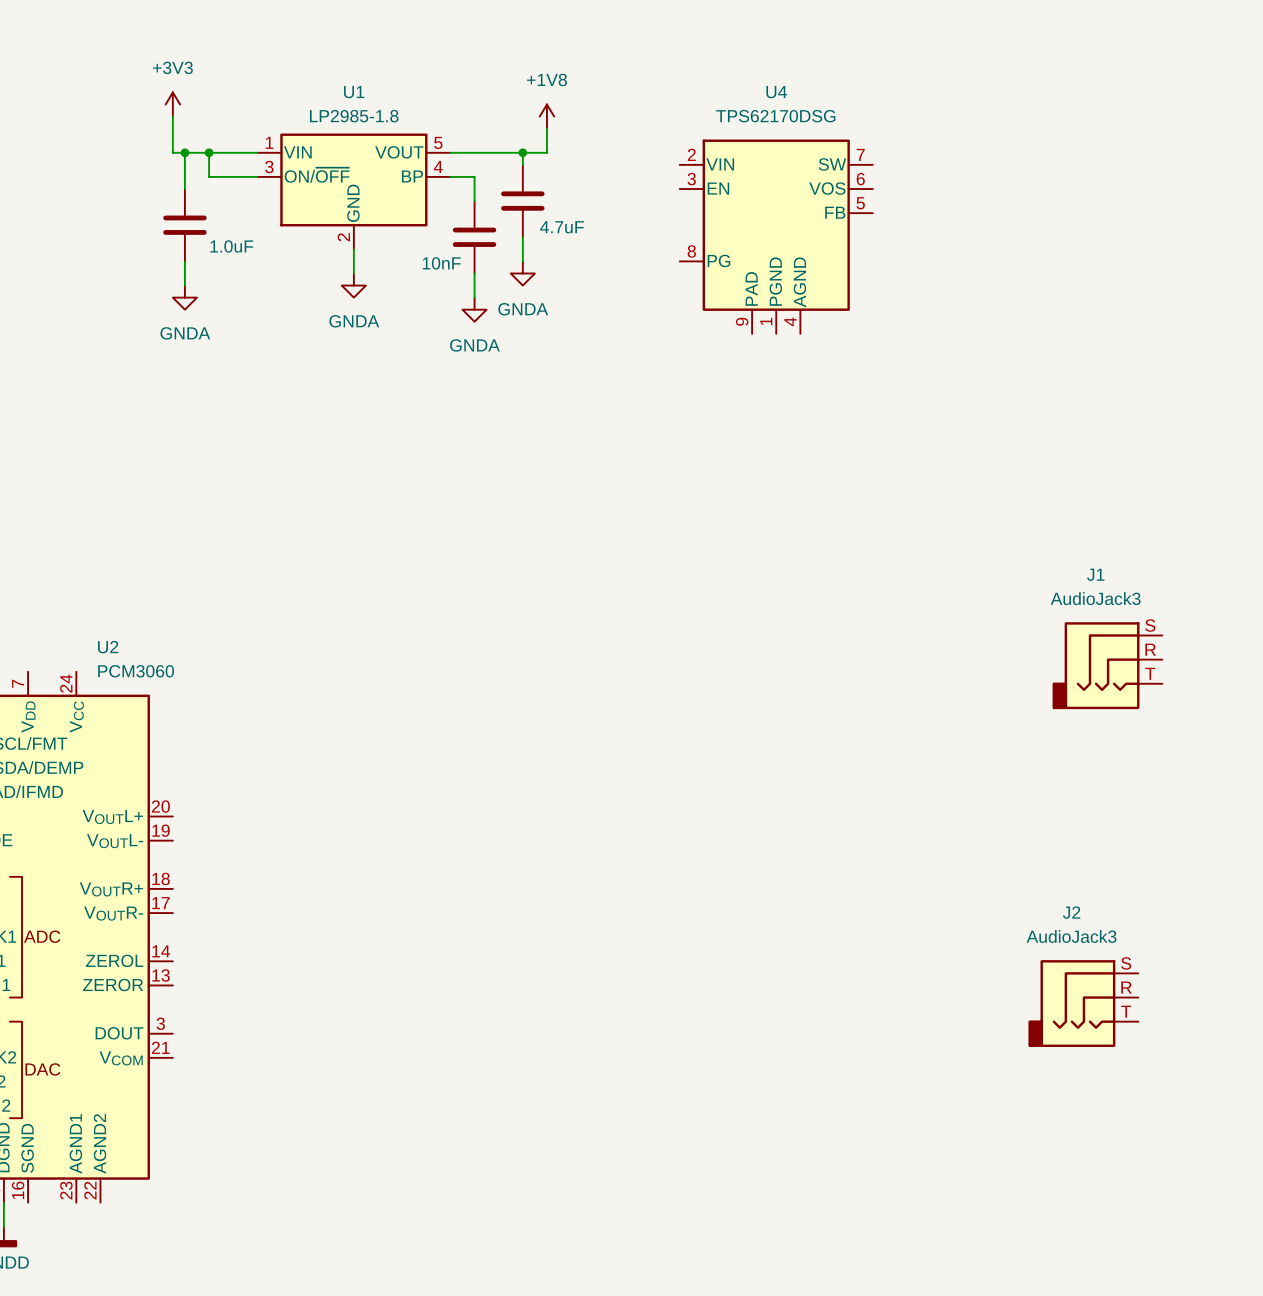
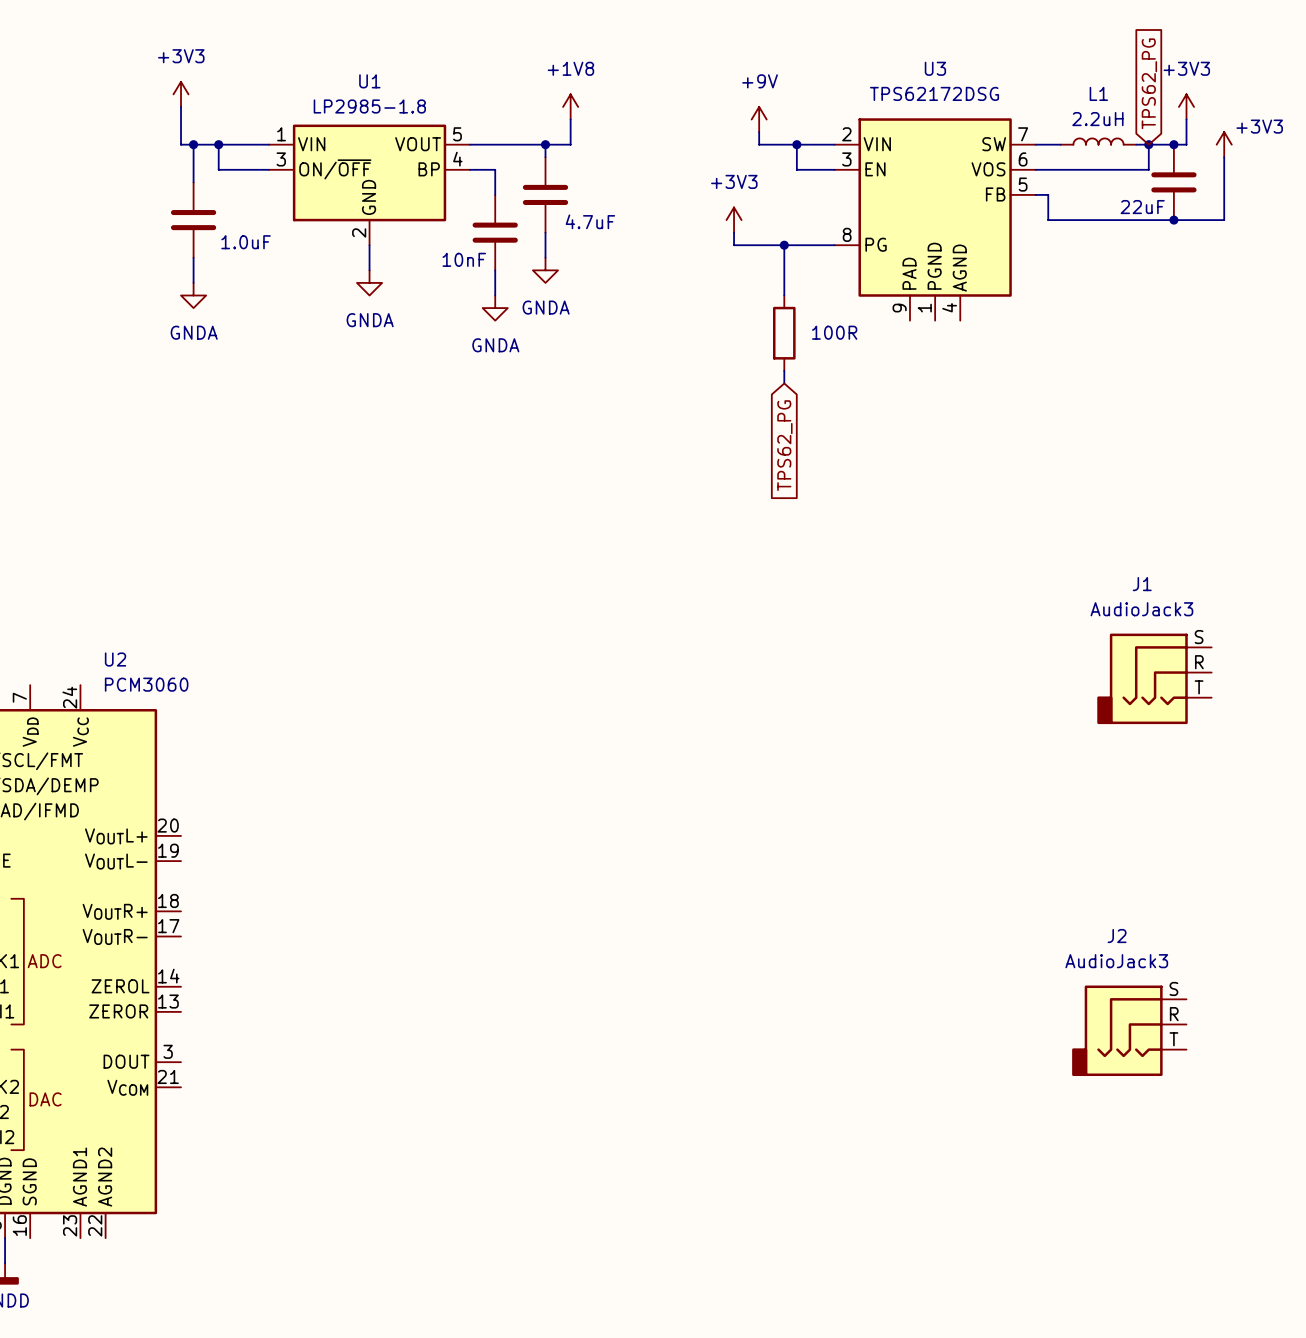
global label: none -> TPS62_PG (1149, 83)
power symbol: none -> +3V3 (1186, 106)
power symbol: none -> +9V (759, 119)
wire: none -> (1186, 119) (1186, 144) (1136, 144)
L1: none -> 2.2uH (1098, 141)
junction: none -> (796, 144)
wire: none -> (1035, 144) (1060, 144)
wire: none -> (1148, 144) (1148, 169) (1035, 169)
junction: none -> (1148, 144)
junction: none -> (1173, 144)
power symbol: none -> +3V3 (1224, 144)
wire: none -> (1224, 157) (1224, 220) (1048, 220) (1048, 194) (1035, 194)
part: none -> 22uF (1173, 182)
U3: none -> TPS62172DSG (935, 219)
power symbol: none -> +3V3 (734, 220)
junction: none -> (1173, 220)
U4: TPS62170DSG (776, 236) -> none
junction: none -> (784, 245)
part: none -> 100R (784, 333)
wire: none -> (784, 370) (784, 383)
global label: none -> TPS62_PG (784, 445)

